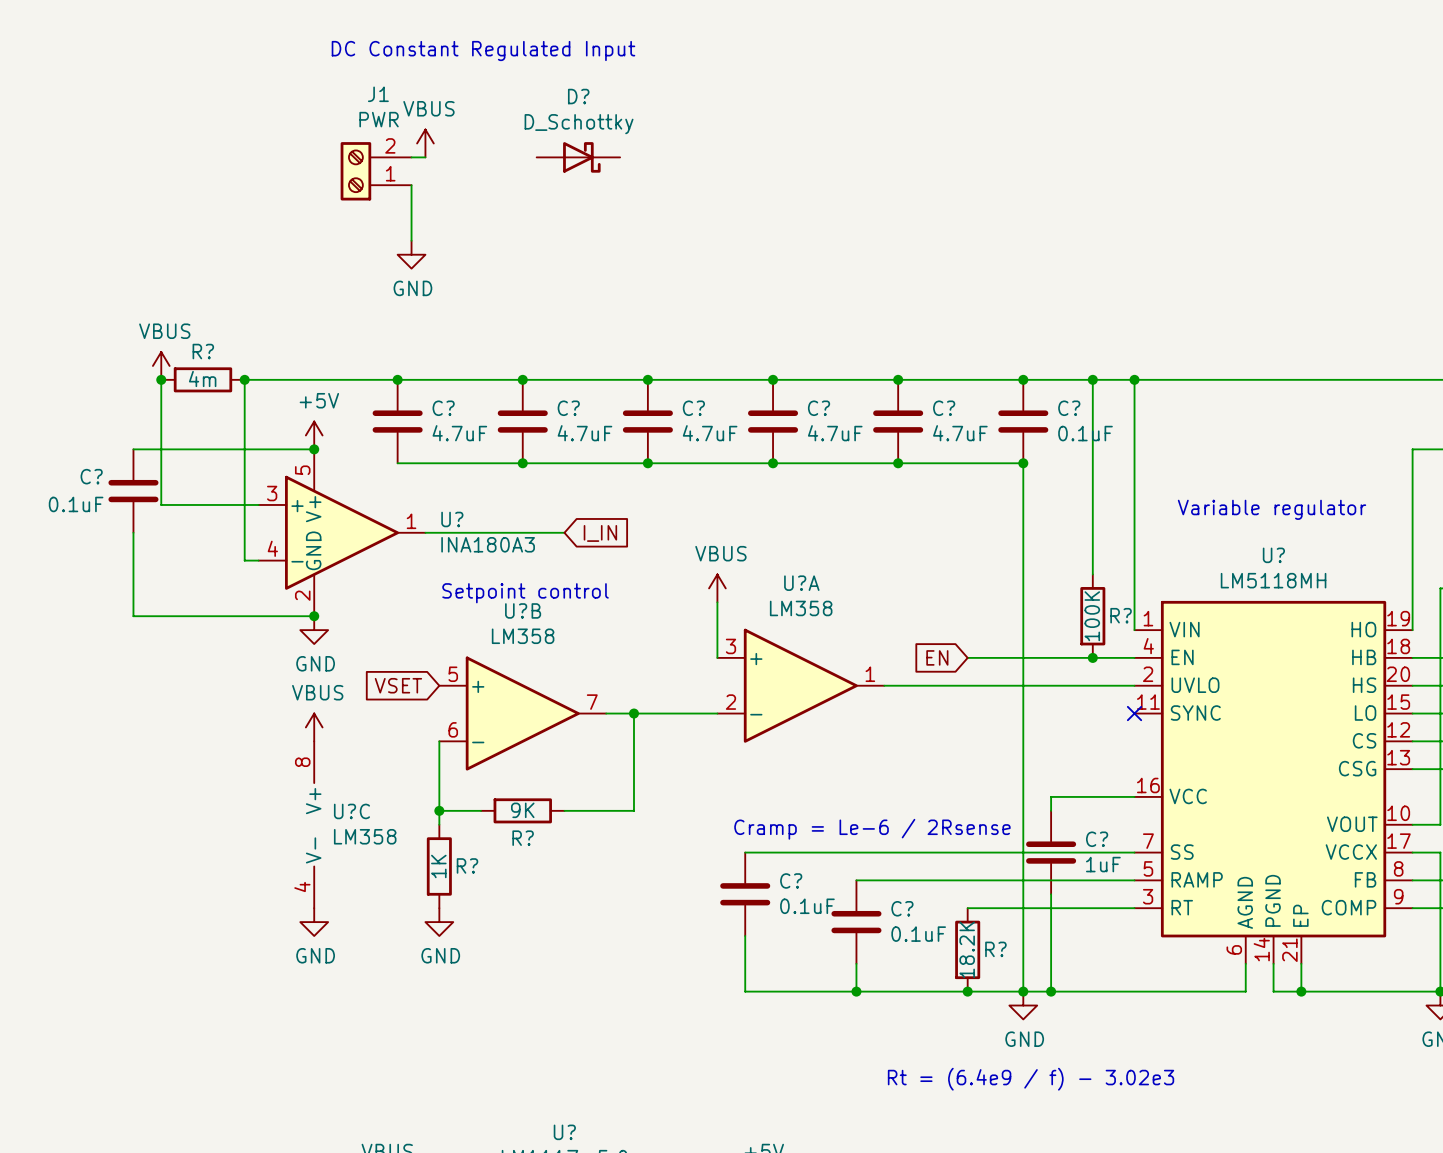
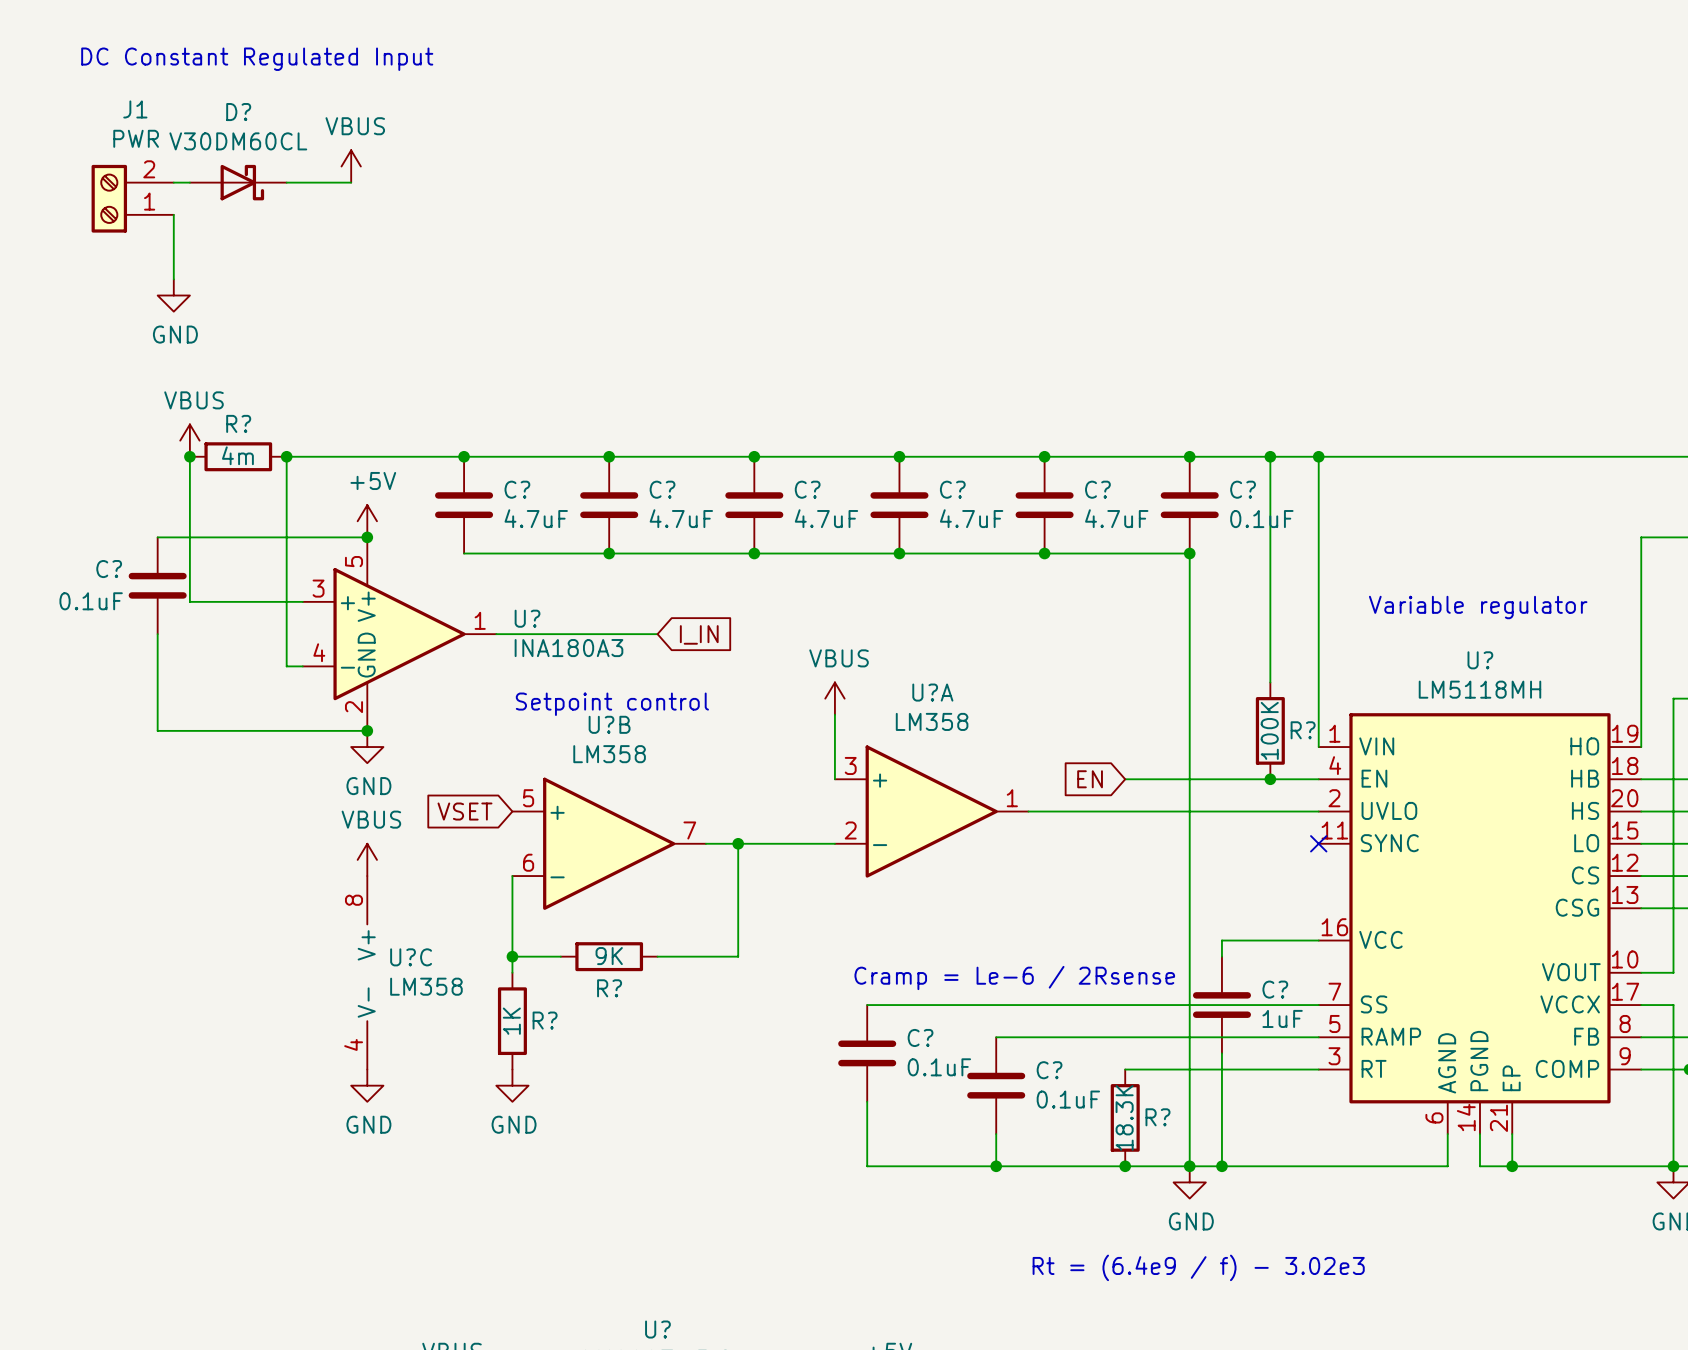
text position: DC Constant Regulated Input (483, 50) -> DC Constant Regulated Input (257, 59)
D?: none -> V30DM60CL (238, 182)
wire: none -> (286, 182) (351, 182)
power symbol position: VBUS (425, 143) -> VBUS (351, 166)
wire: (411, 157) (425, 157) -> (173, 182) (189, 182)
D?: D_Schottky (578, 157) -> none
J1 position: (376, 171) -> (132, 198)
wire: (411, 185) (411, 240) -> (173, 214) (173, 279)
power symbol position: GND (411, 254) -> GND (173, 295)
R? value: 18.2K (967, 949) -> 18.3K (1124, 1117)

